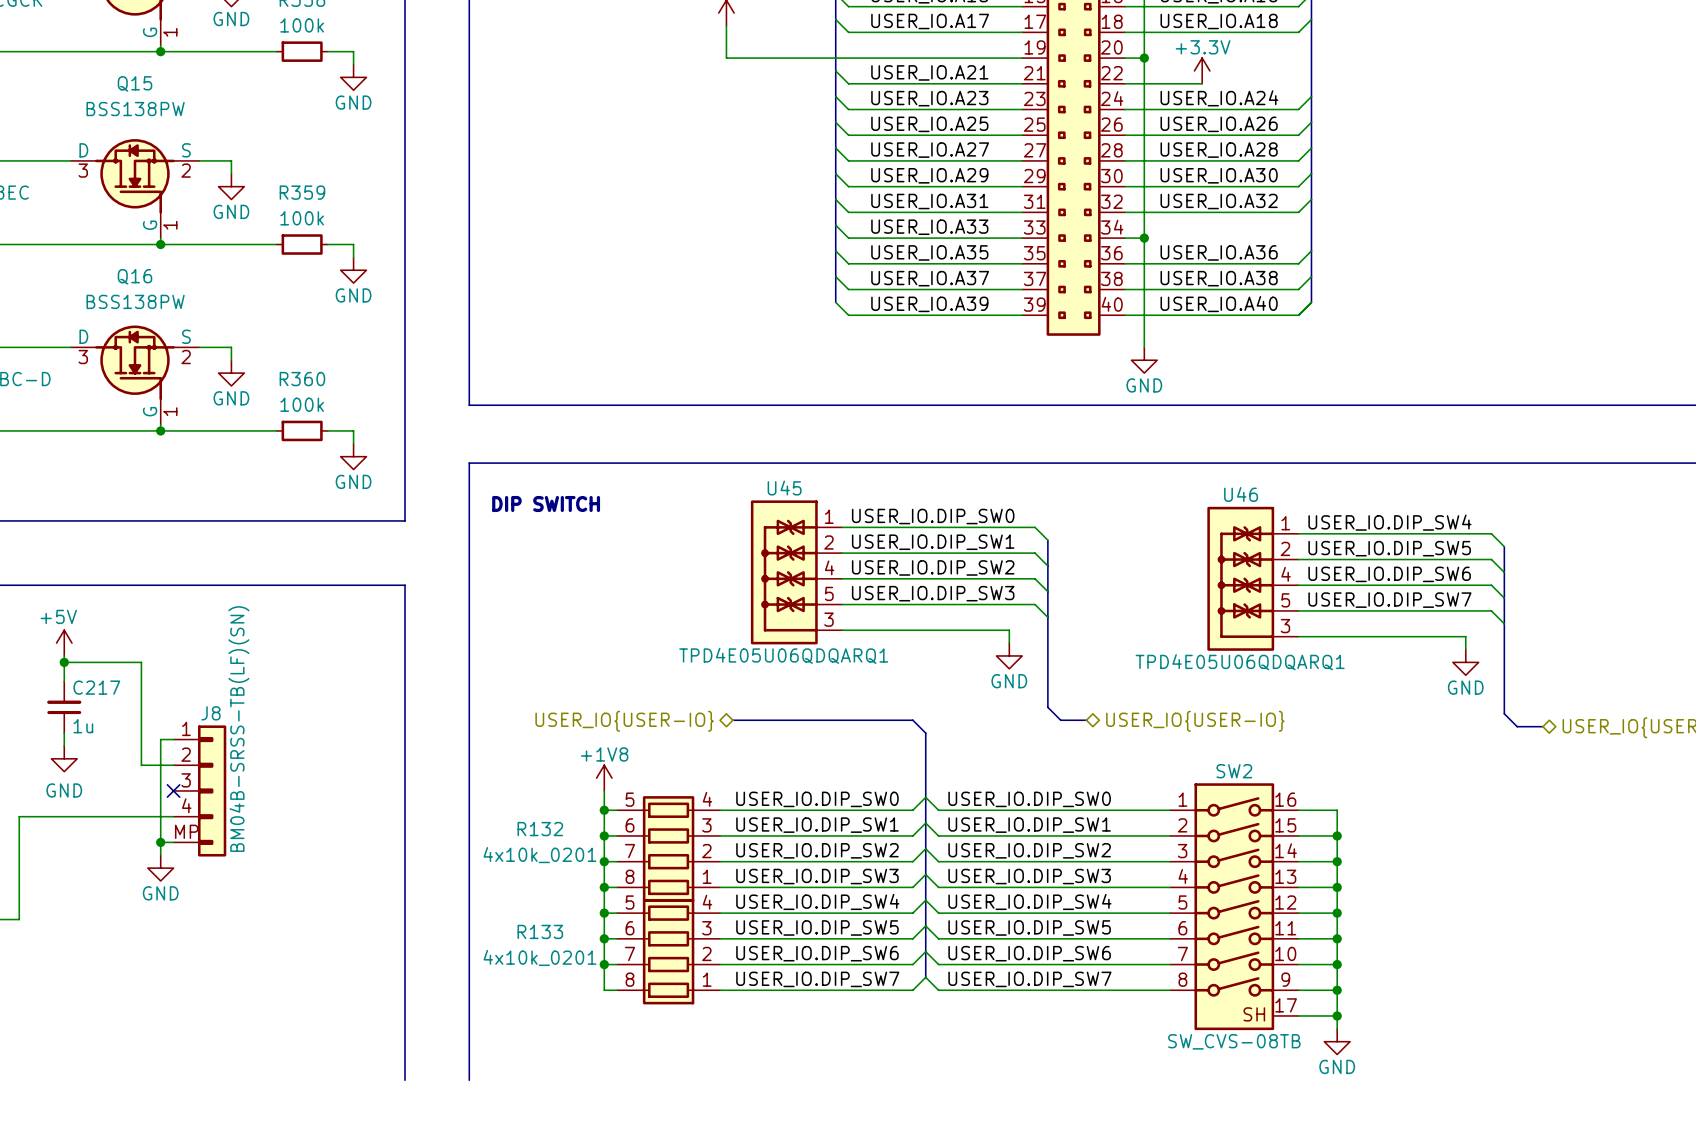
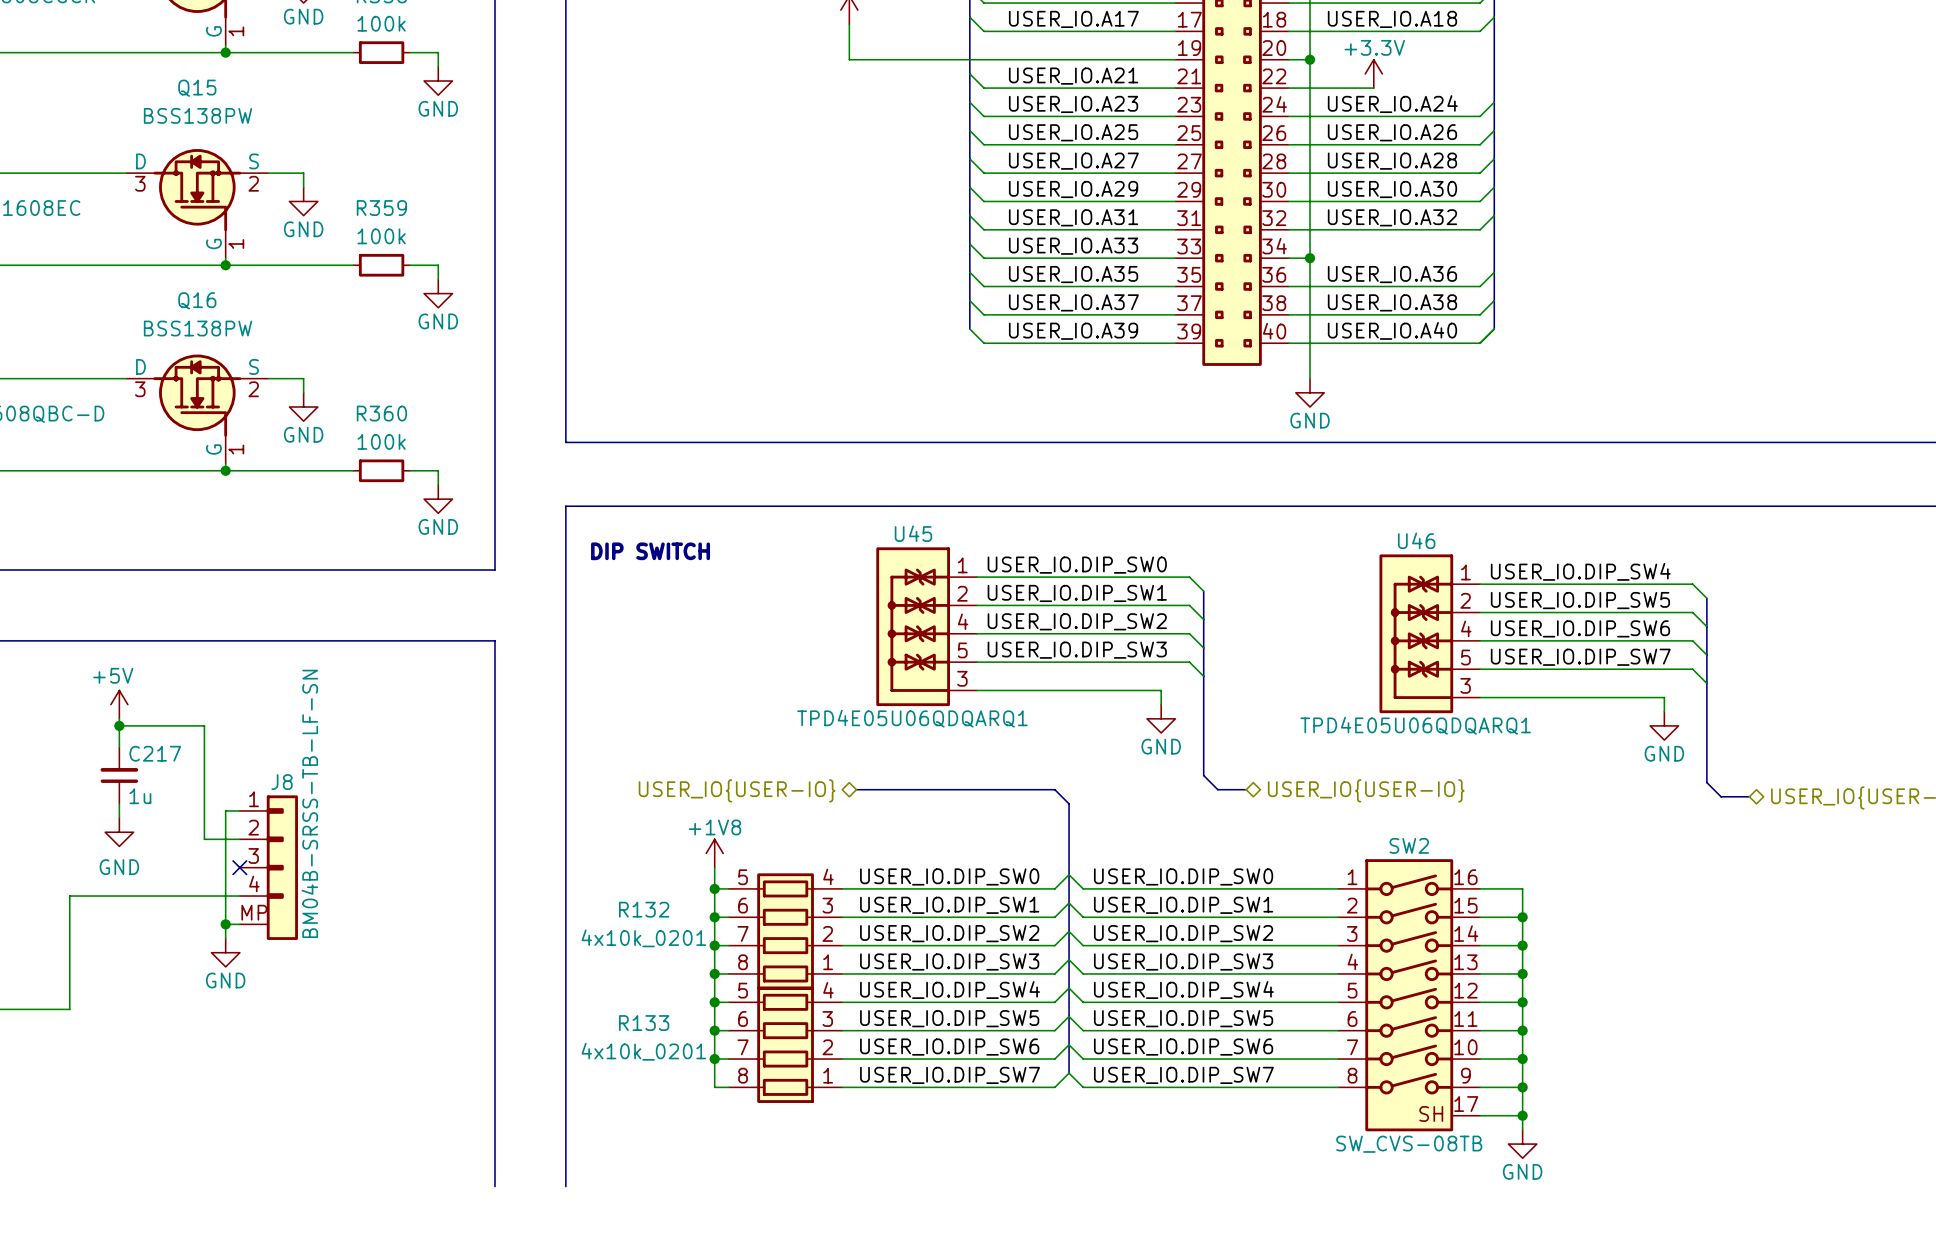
J8 symbol: [173, 725, 227, 857] -> [239, 795, 298, 940]
J8 text: BM04B-SRSS-TB(LF)(SN) (238, 729) -> none
J8 value: none -> BM04B-SRSS-TB-LF-SN (309, 803)

